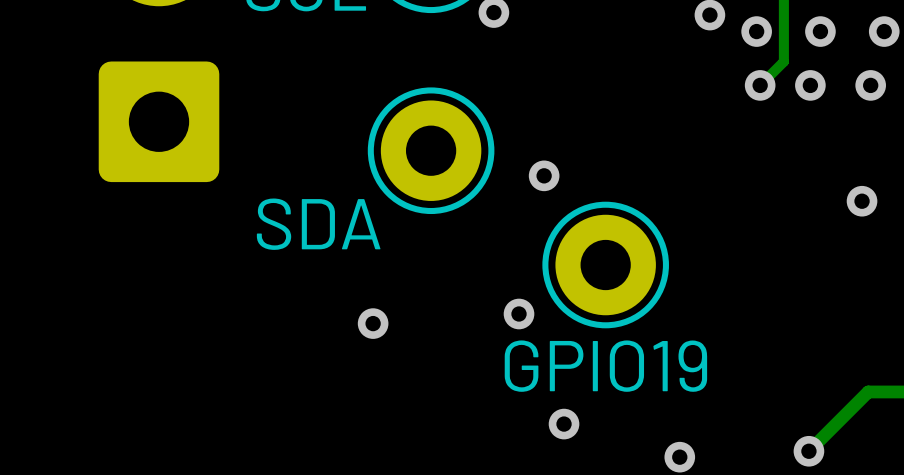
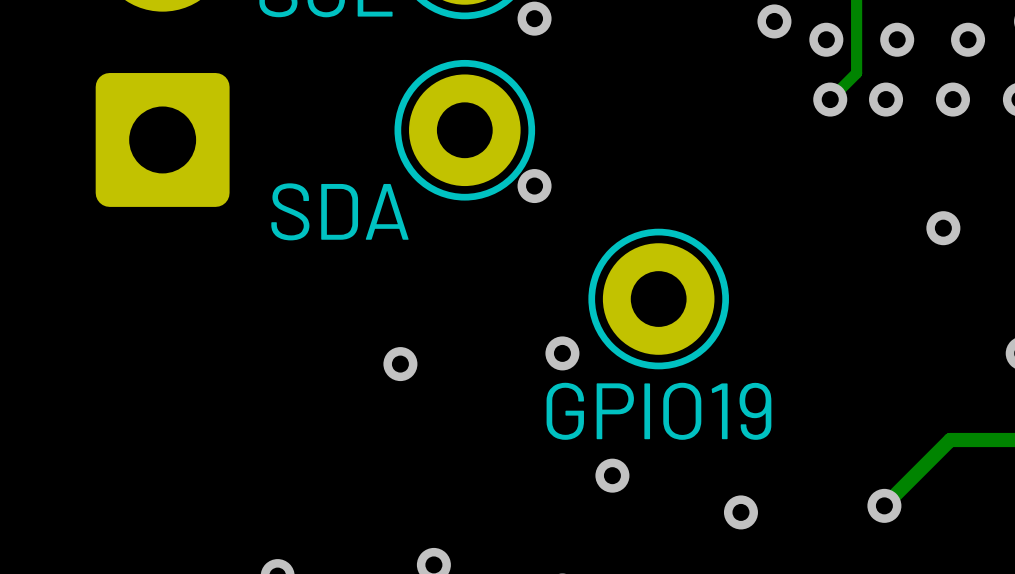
part position: (431, 150) -> (464, 130)
via position: (544, 175) -> (534, 186)

